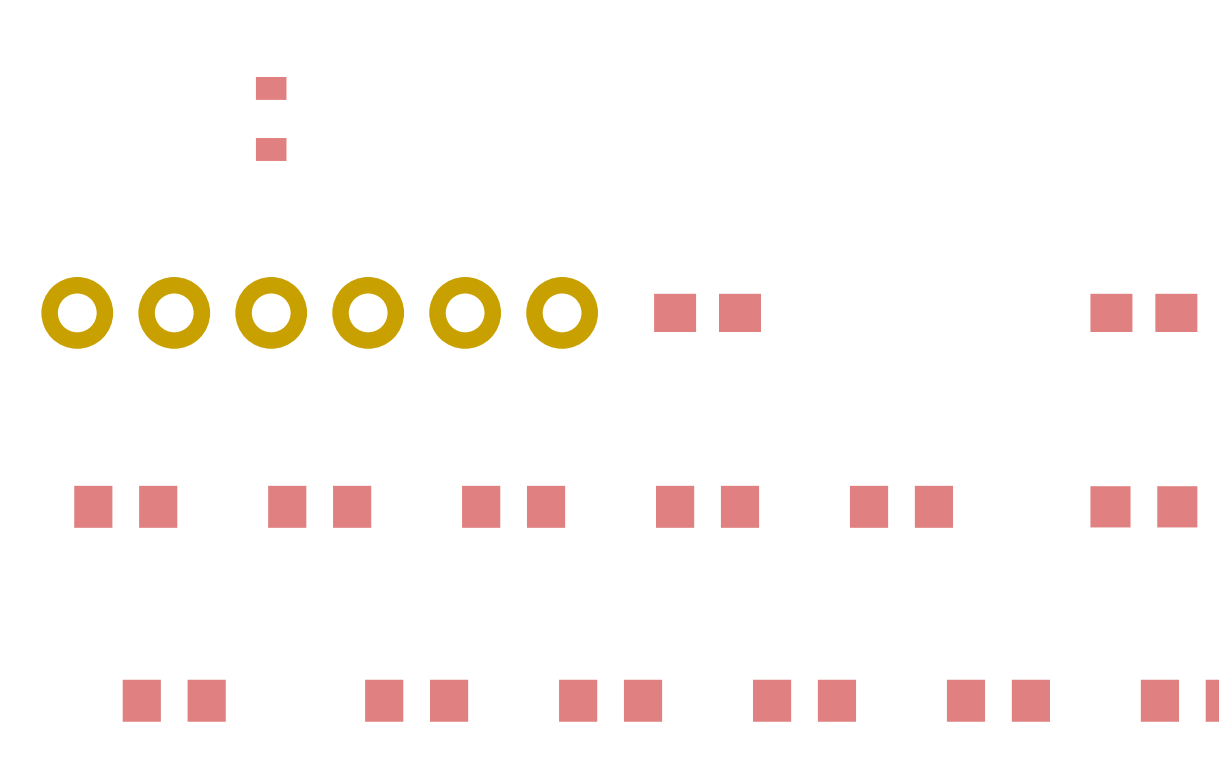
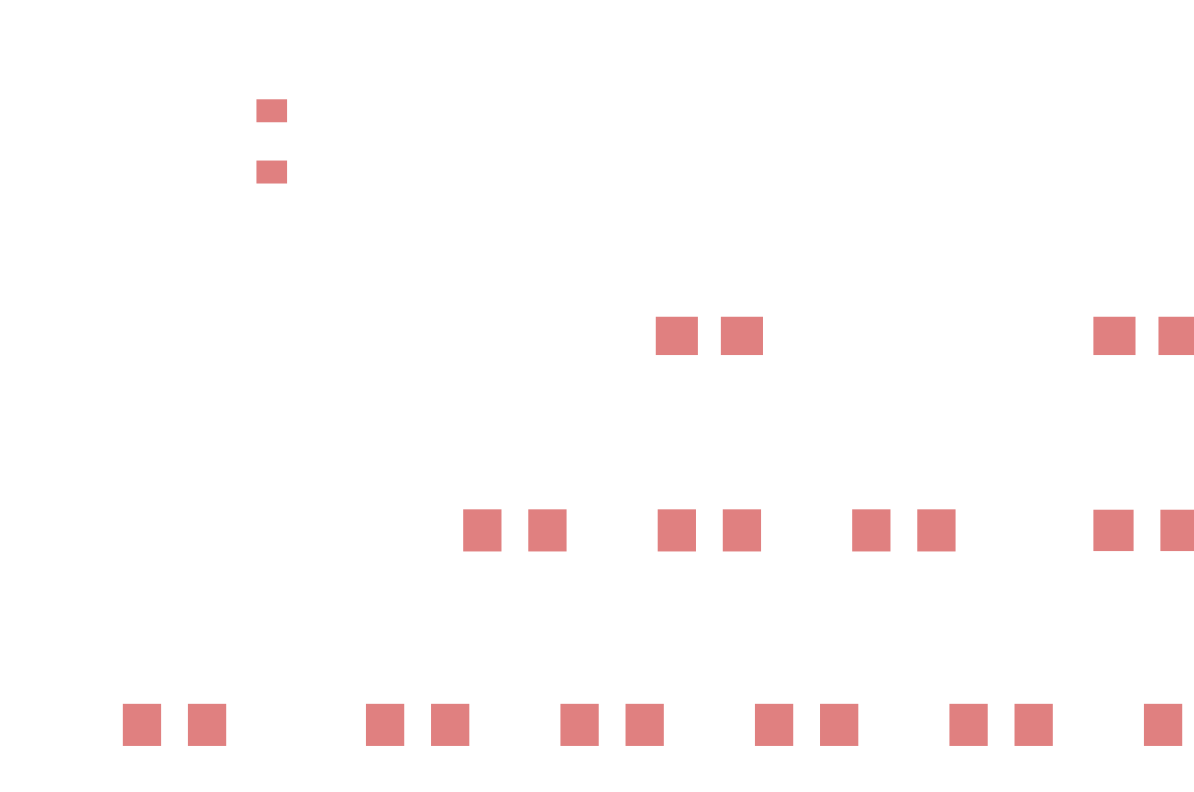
part: (319, 312) -> none
part: (125, 506) -> none
part: (319, 506) -> none

